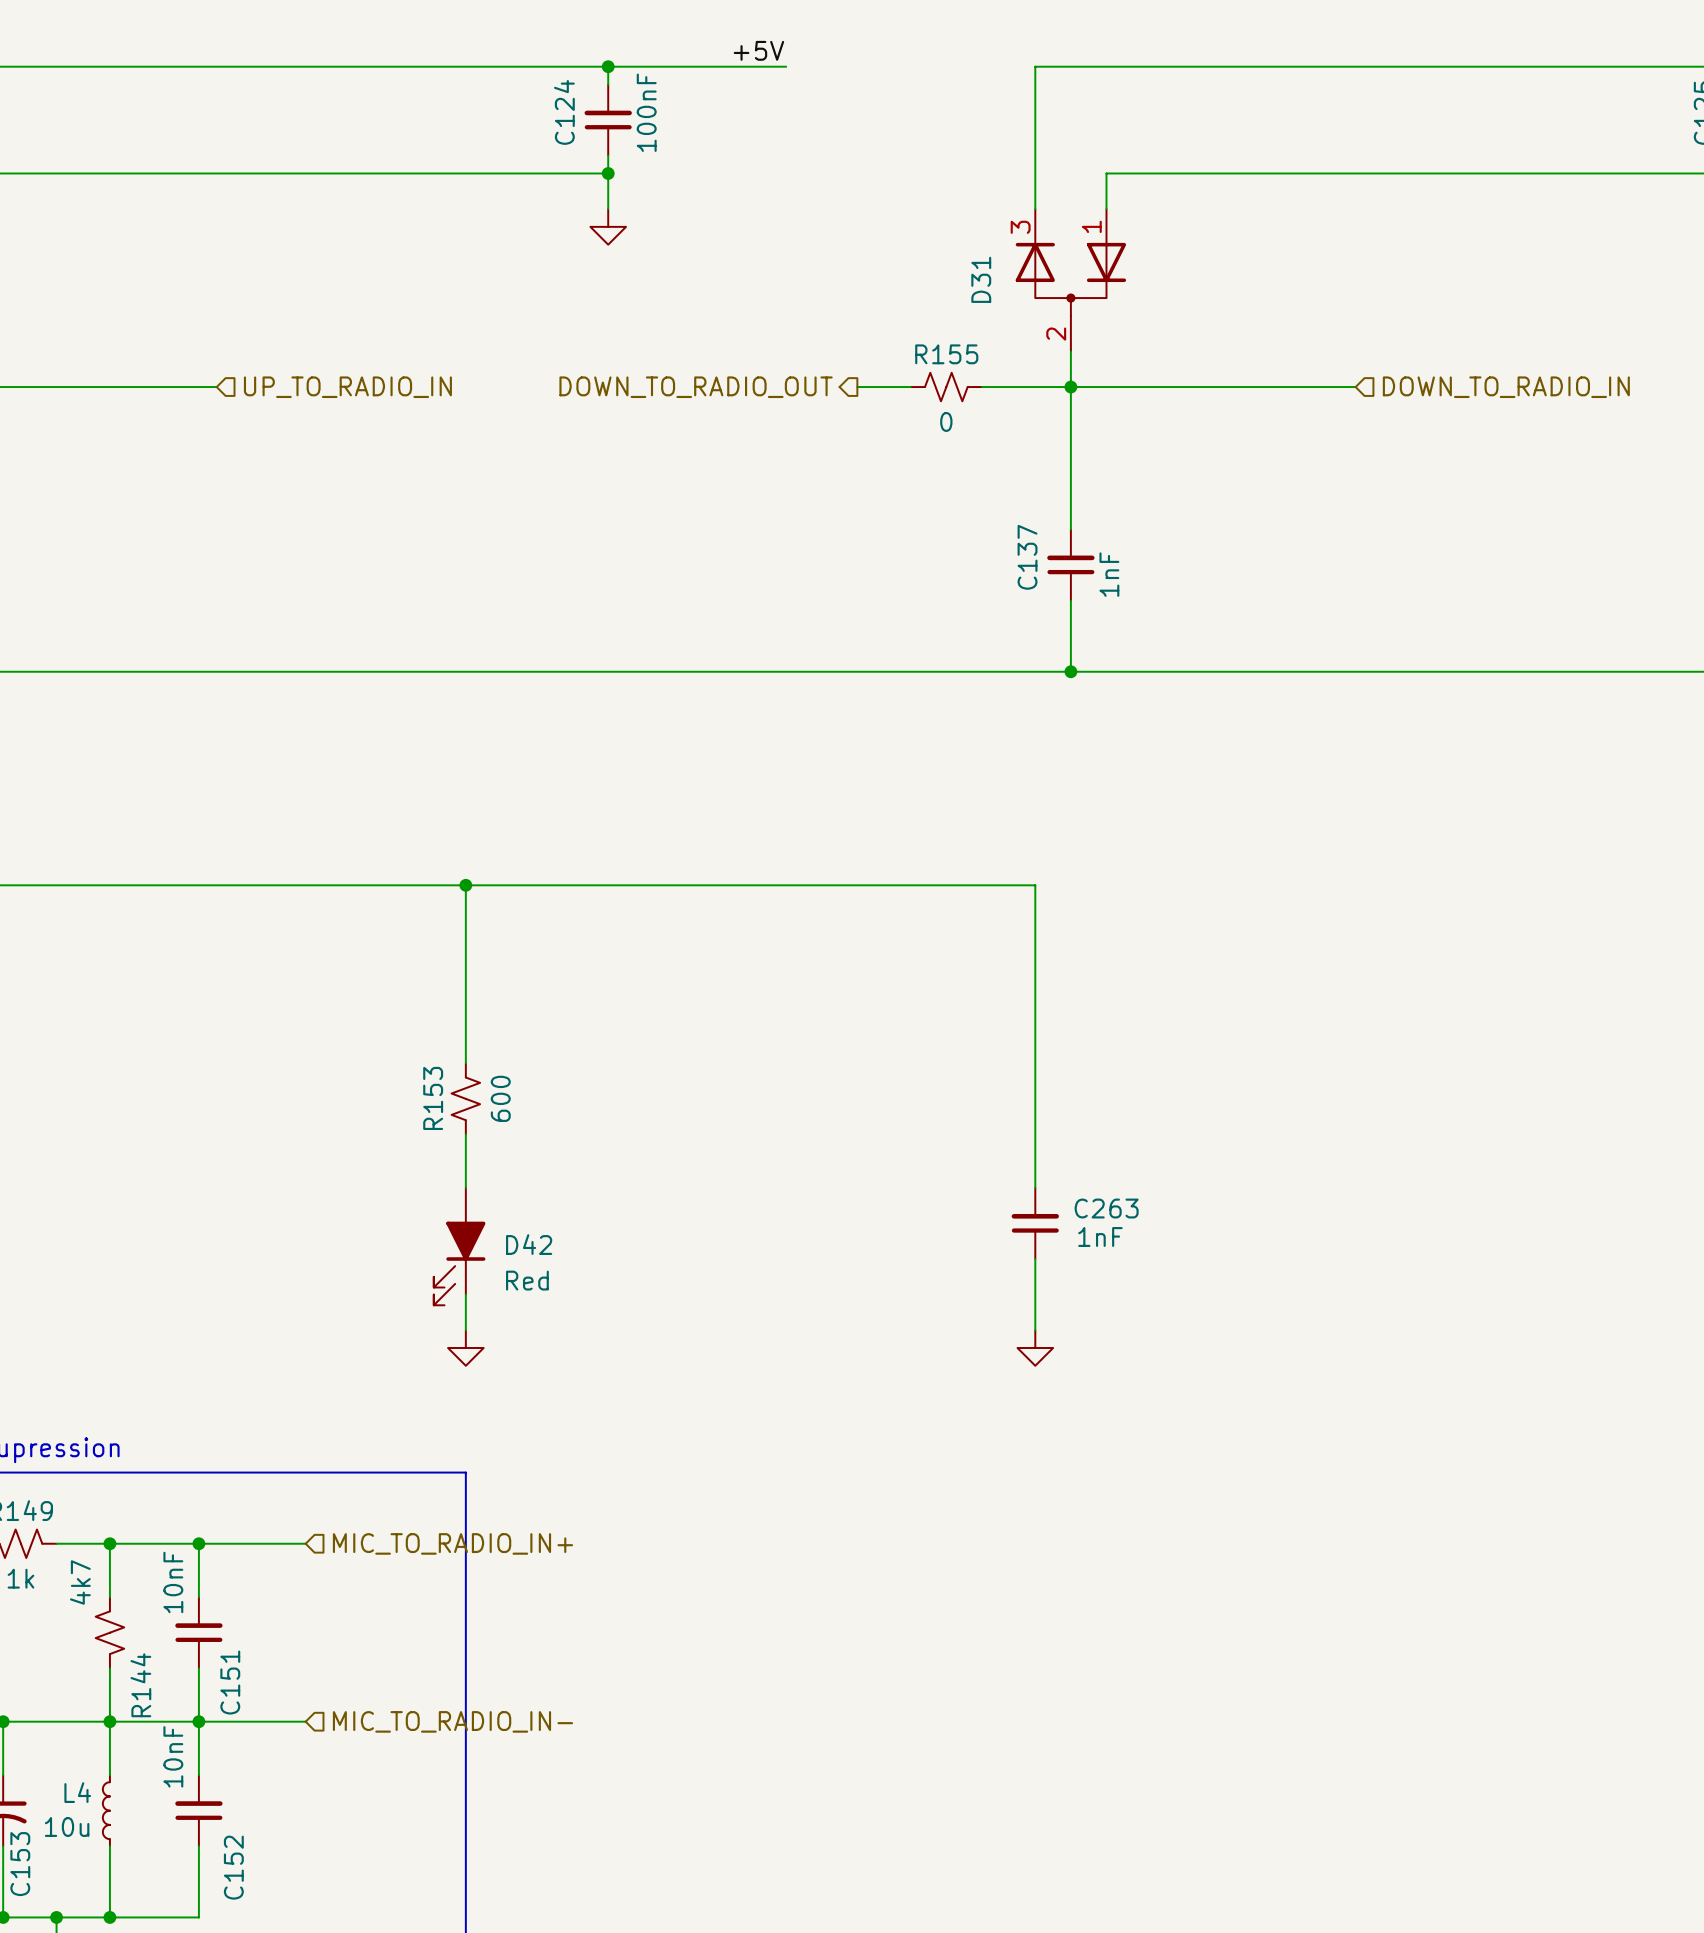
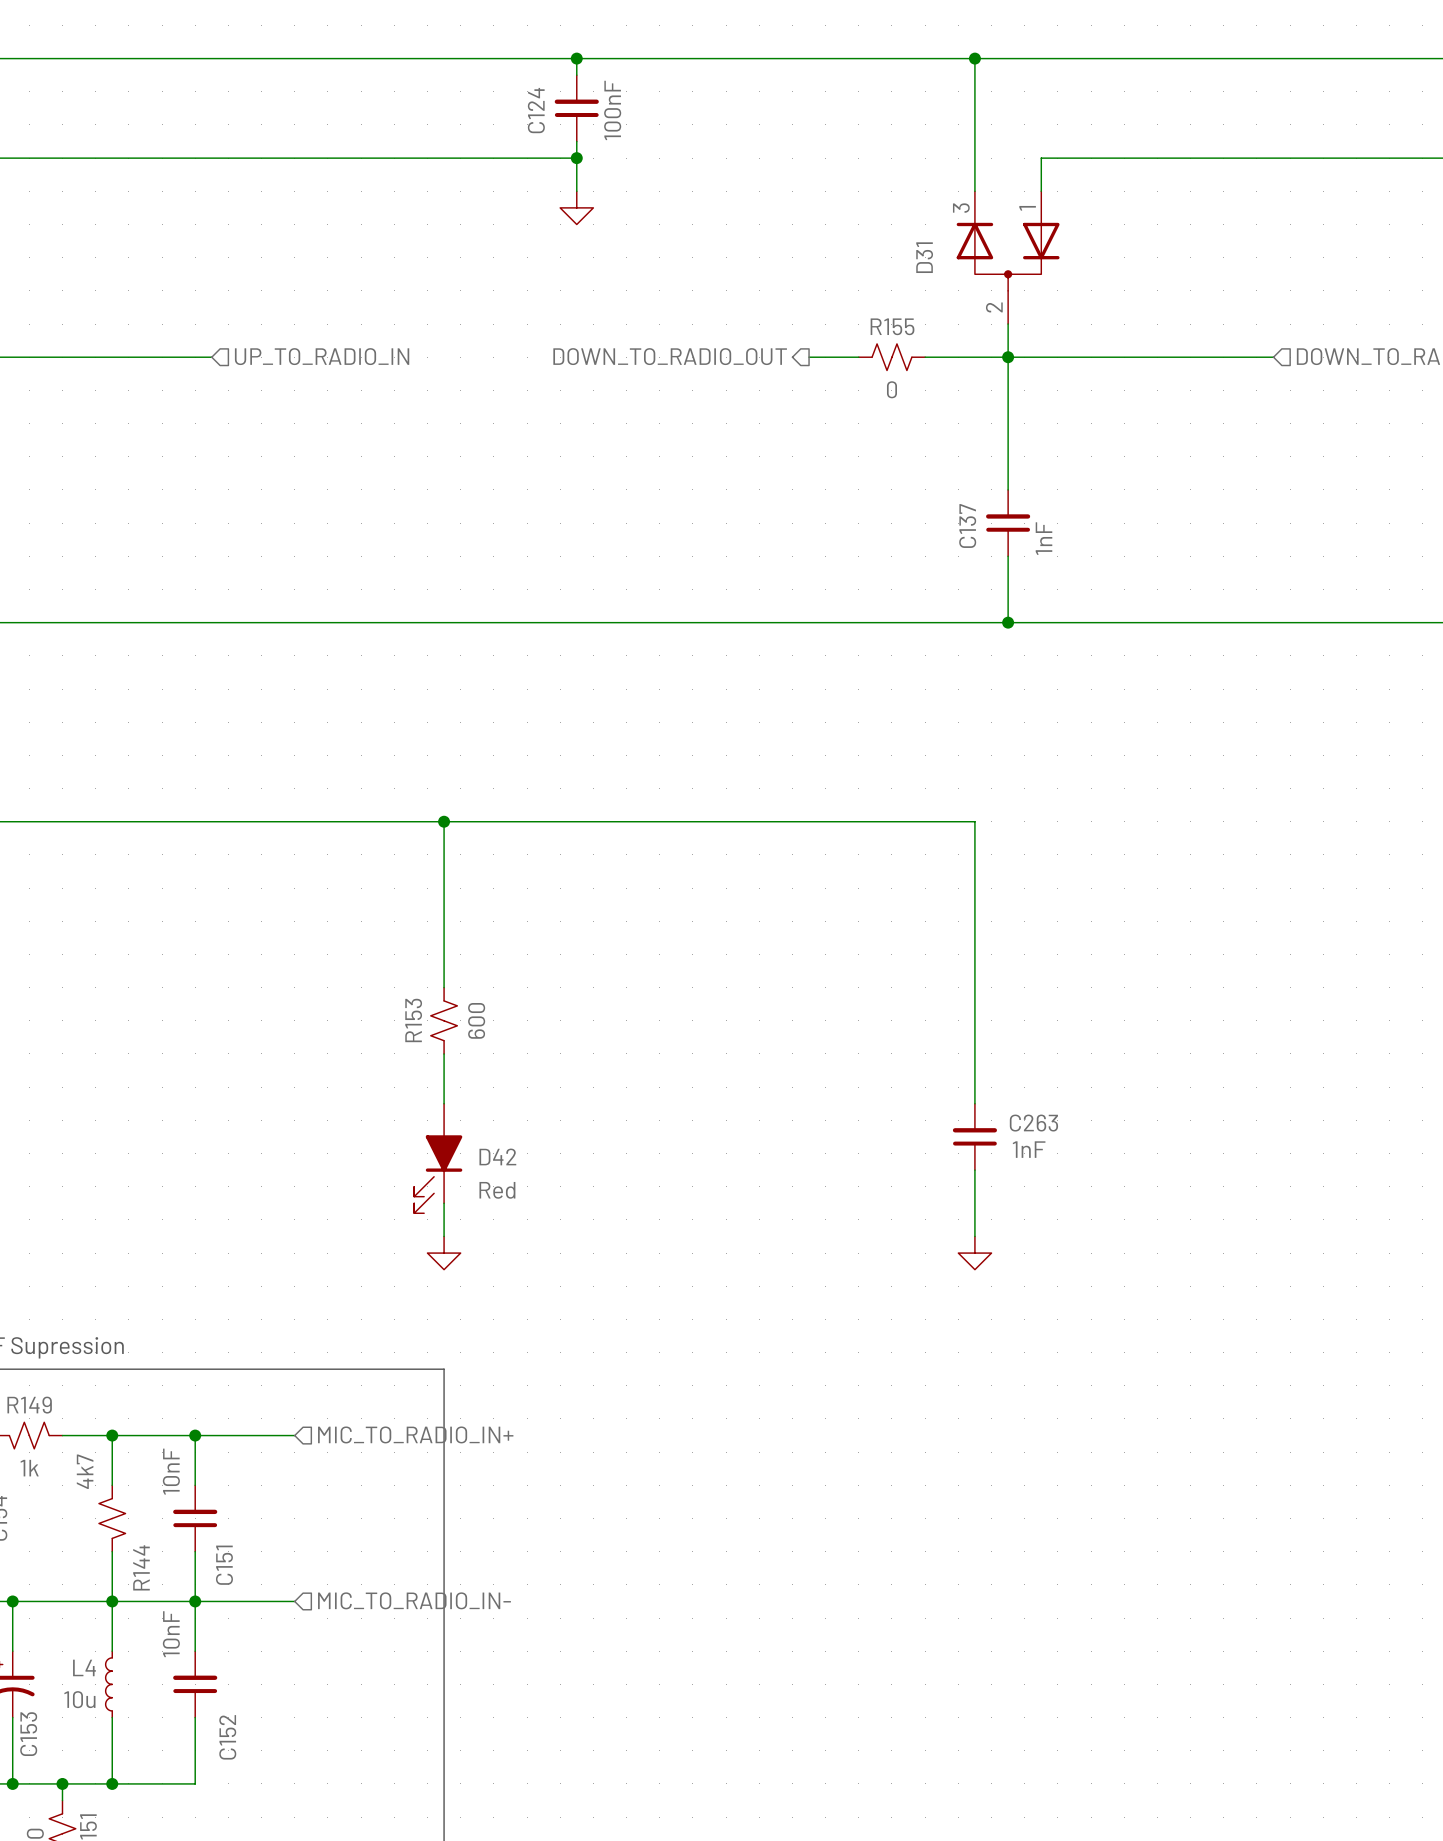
label: +5V (758, 50) -> none
wire: none -> (742, 58) (974, 58)
junction: none -> (974, 58)

